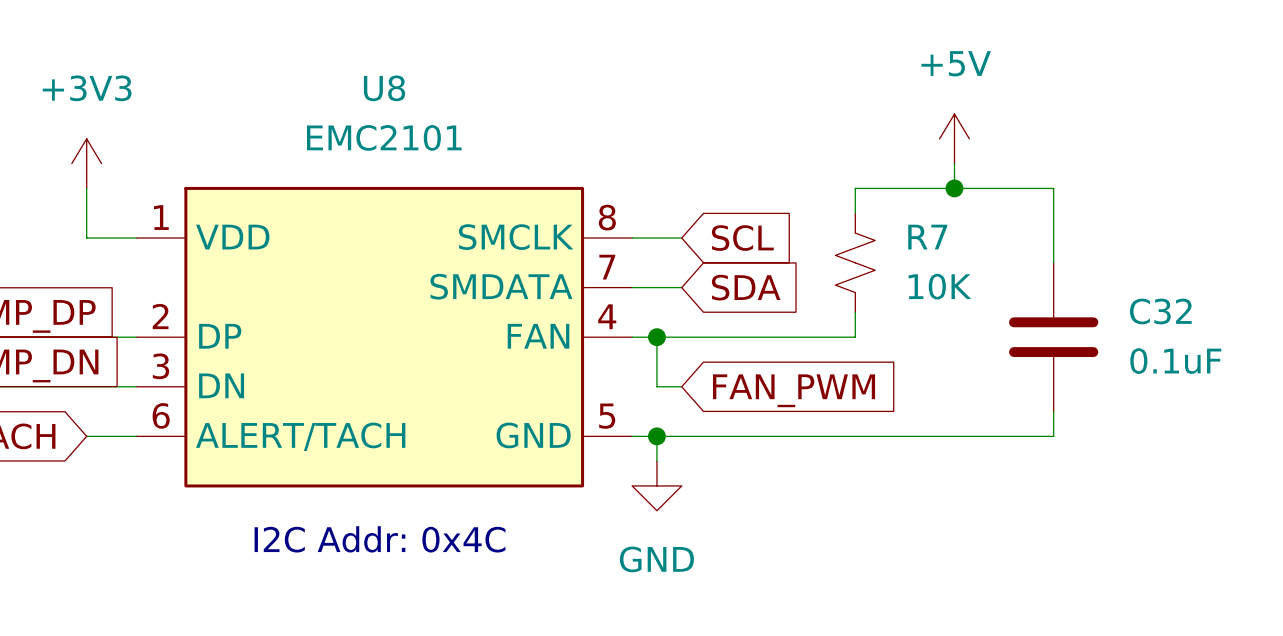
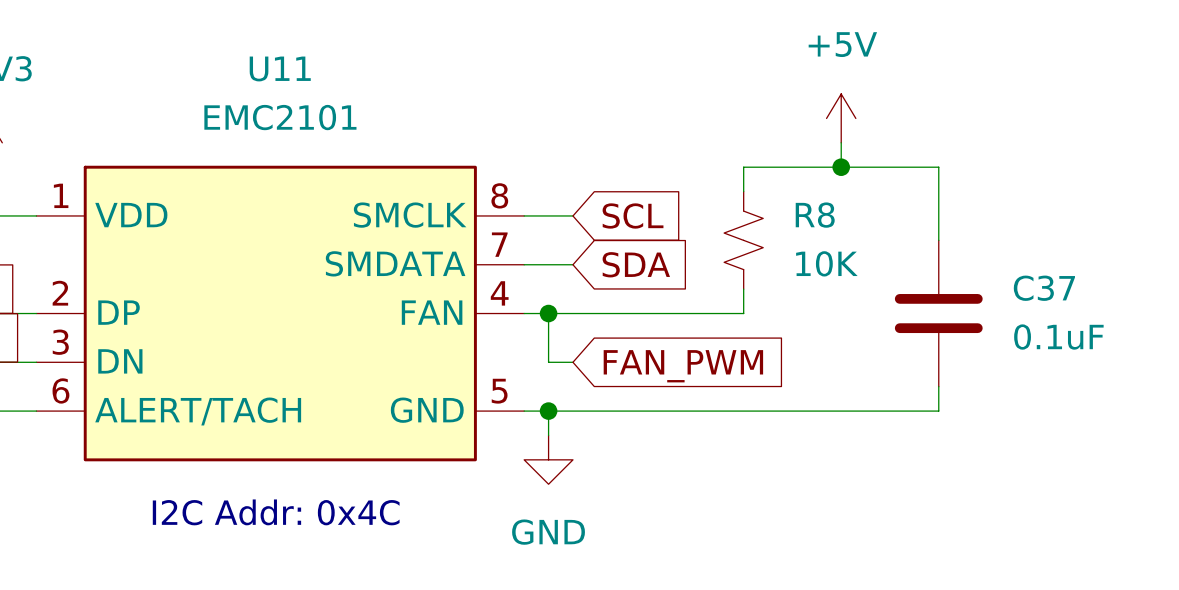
U8 name: U8 (384, 88) -> U11 (280, 68)
R7 name: R7 (927, 237) -> R8 (815, 215)
C32 name: C32 (1160, 311) -> C37 (1044, 288)

